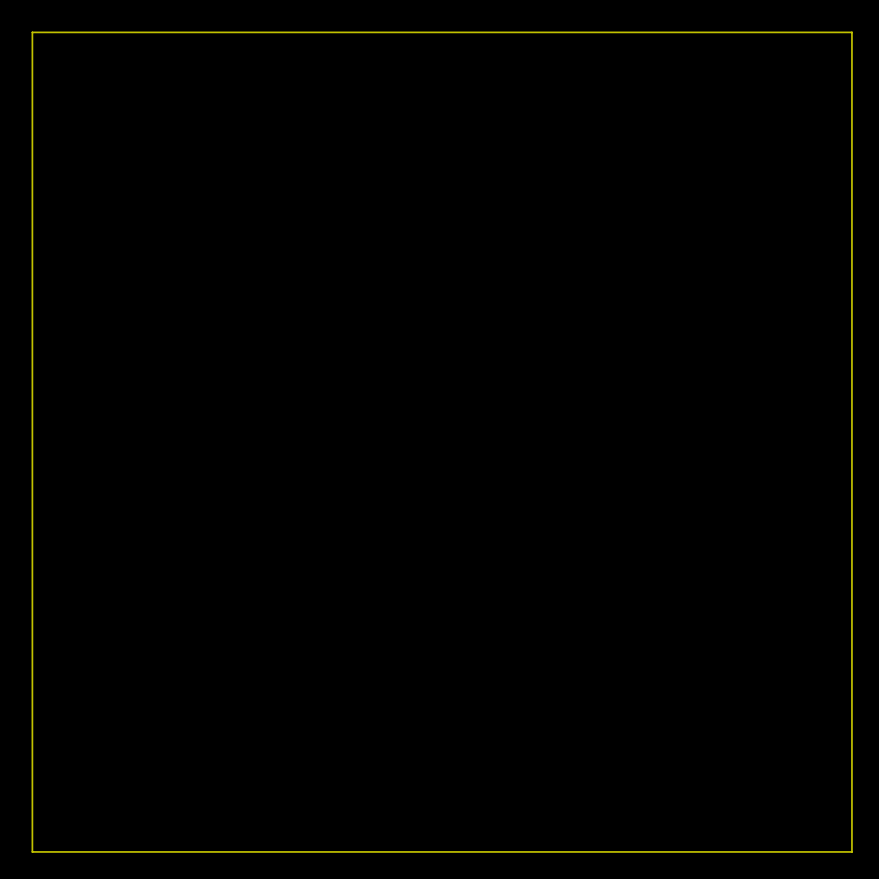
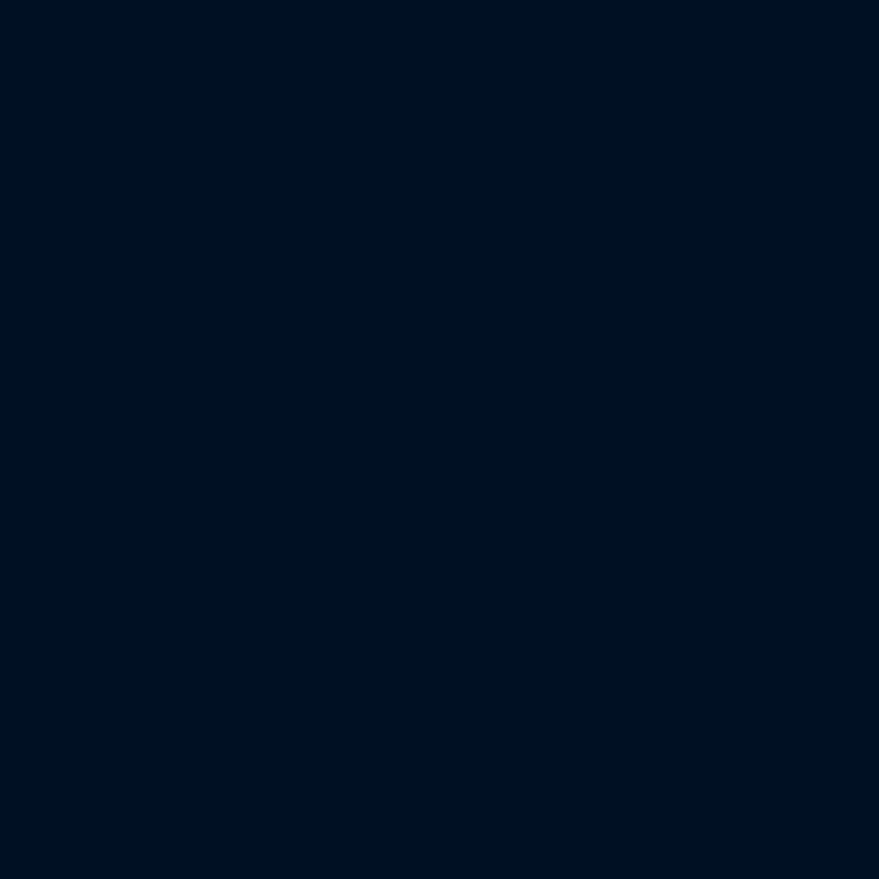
board edge: (851, 32) (32, 32) (32, 851) (851, 851) (851, 32) -> none

